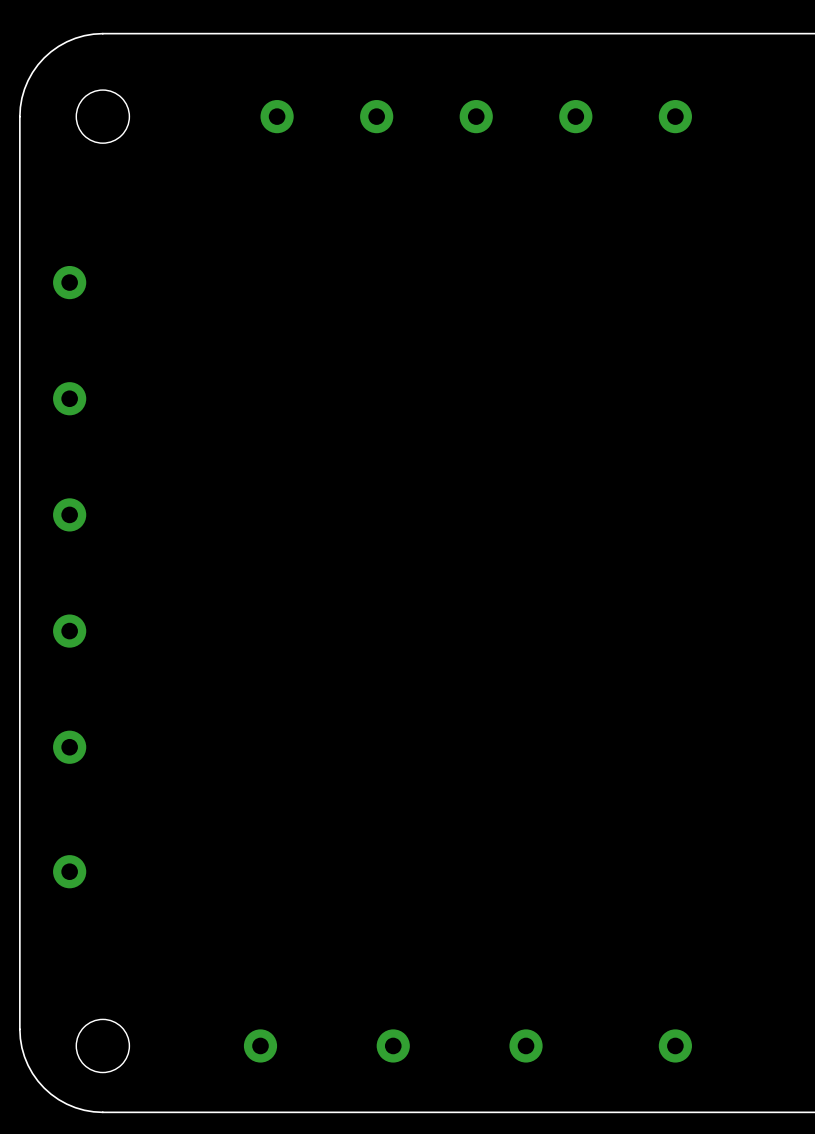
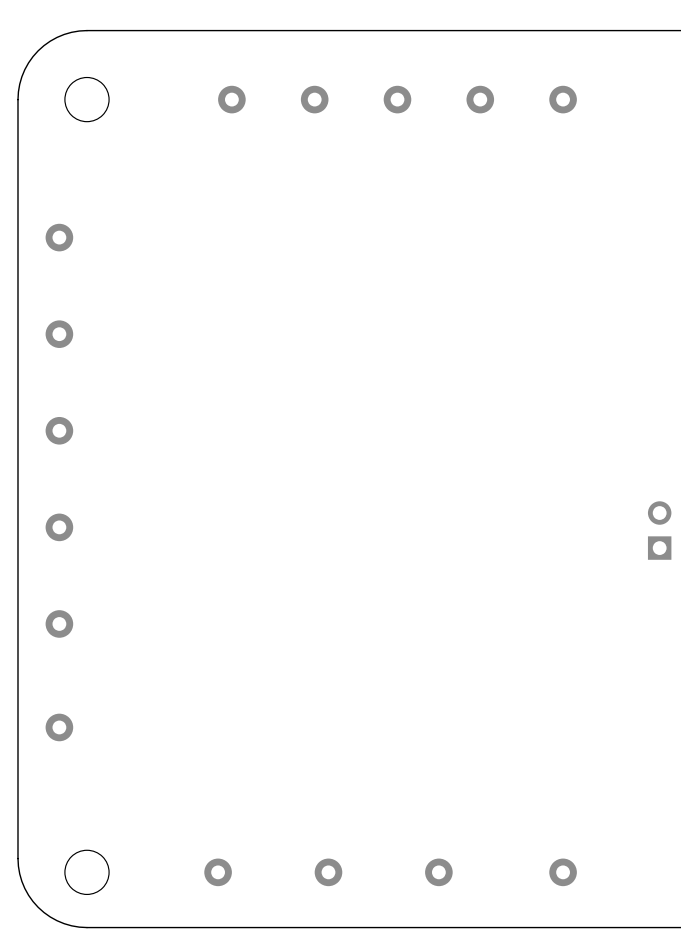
part: none -> (659, 530)

